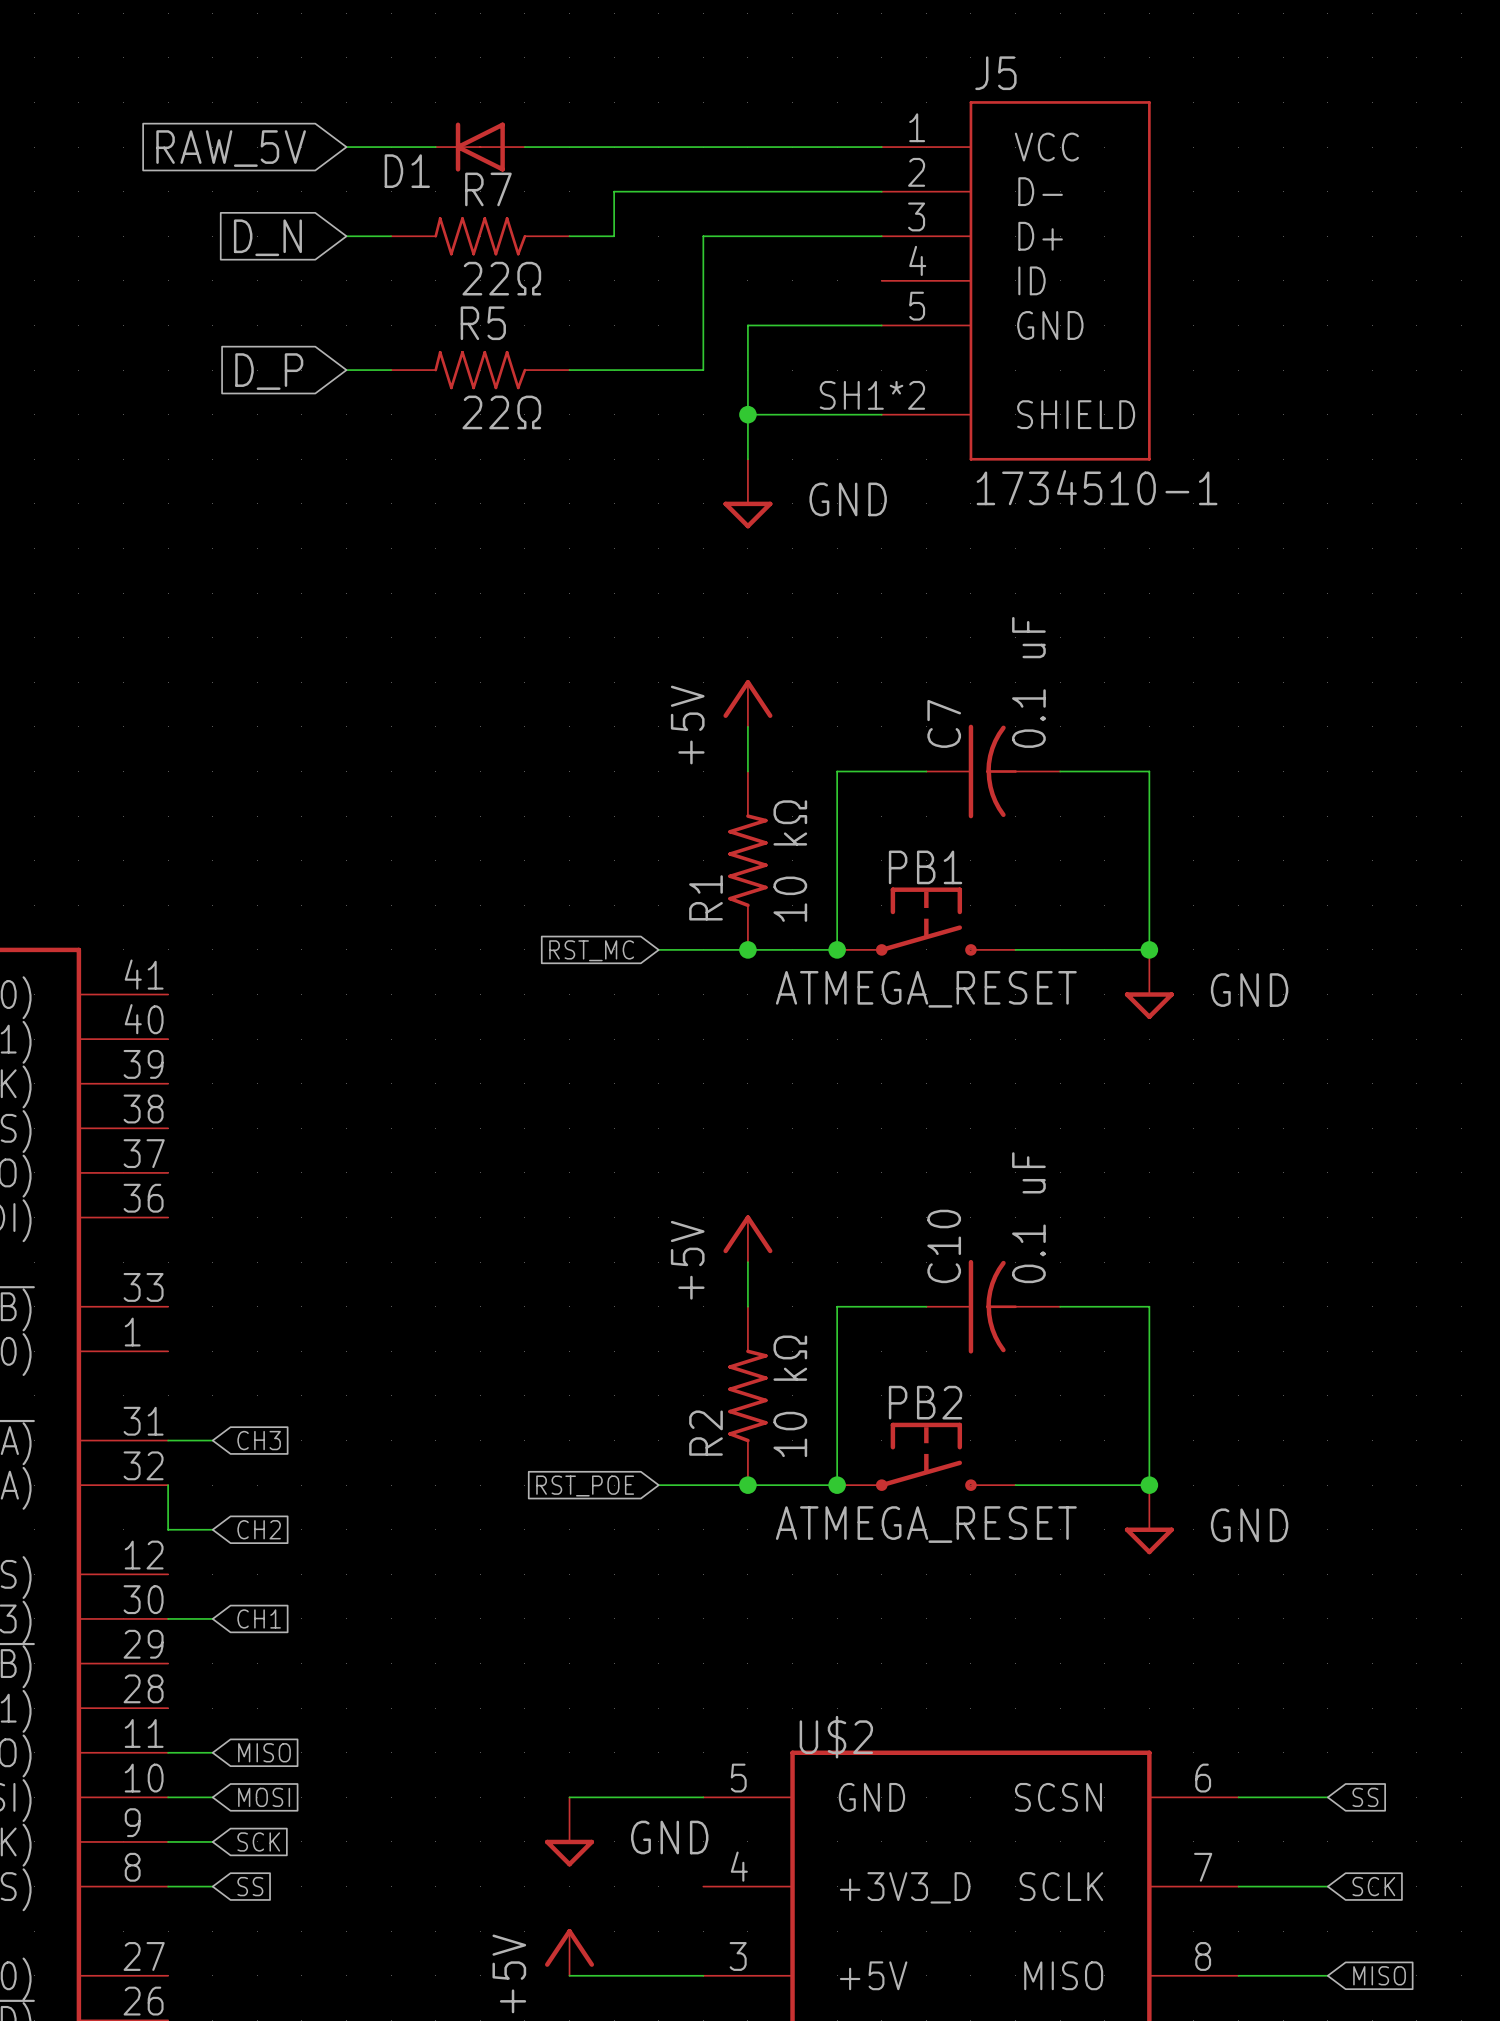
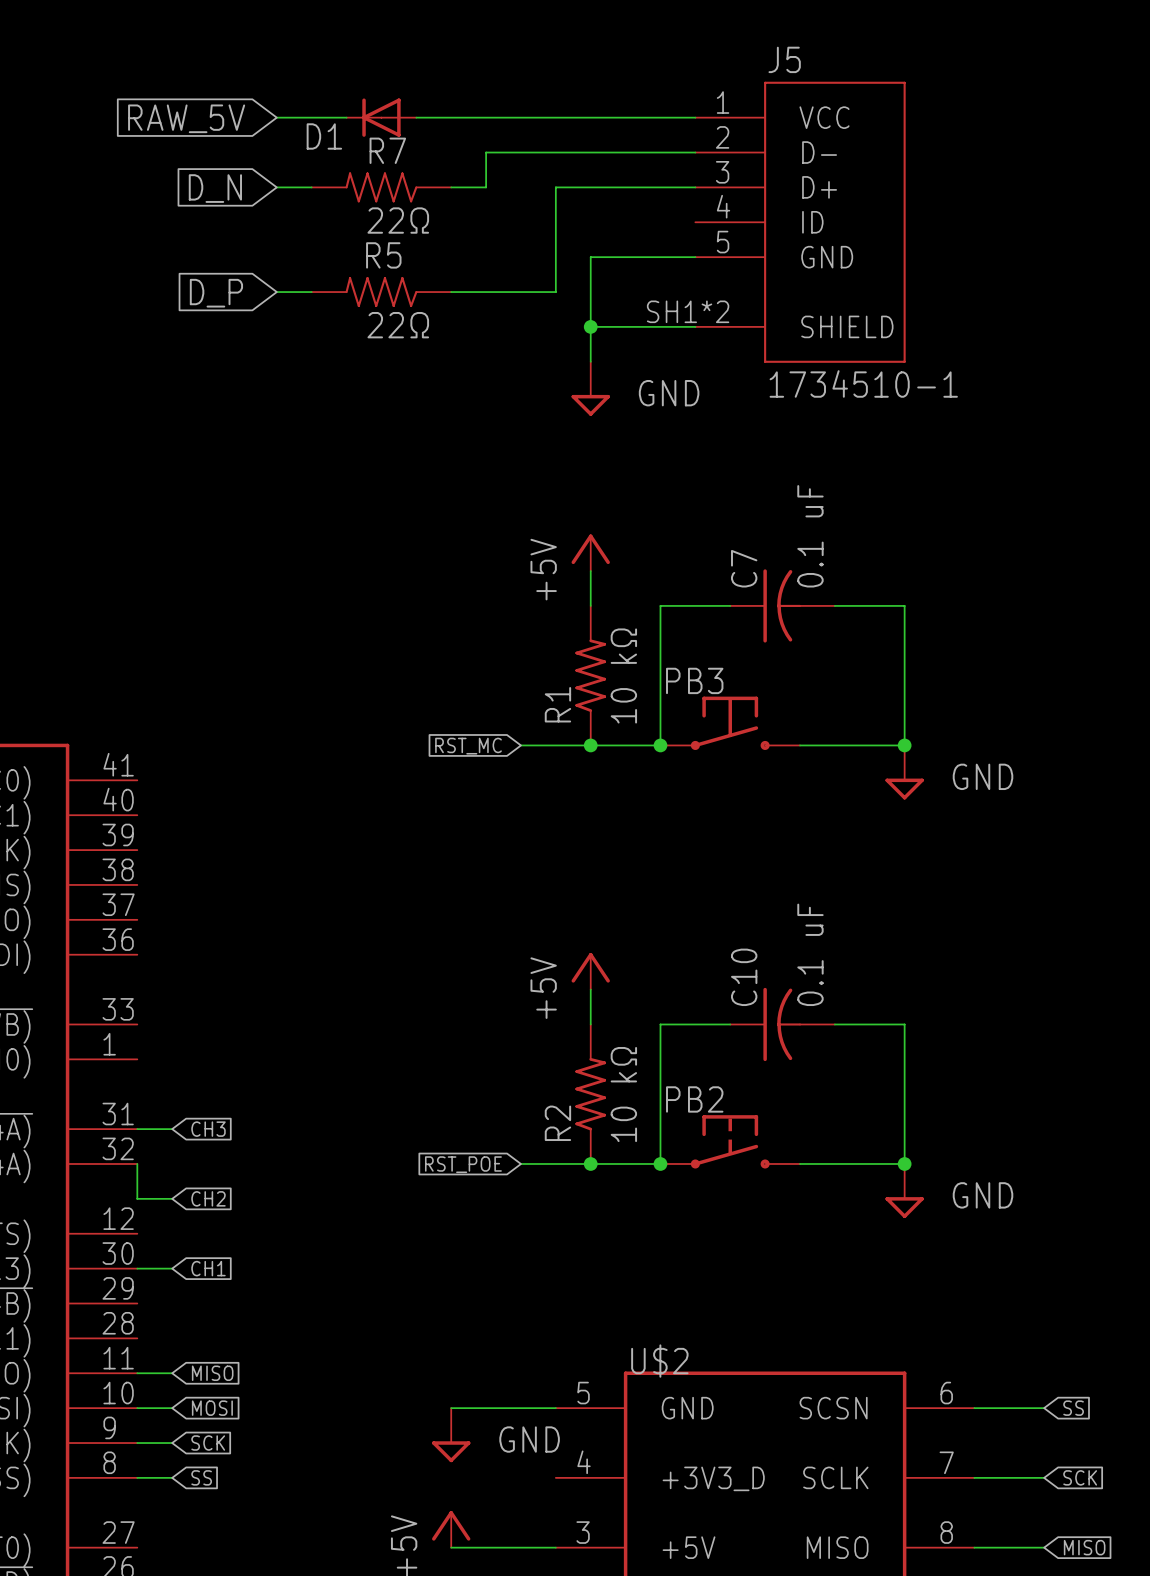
PB1: ATMEGA_RESET (926, 921) -> none
PB3: none -> (730, 723)
PB2 name position: PB2 (925, 1402) -> PB2 (694, 1099)
PB2 value: ATMEGA_RESET (926, 1524) -> none

